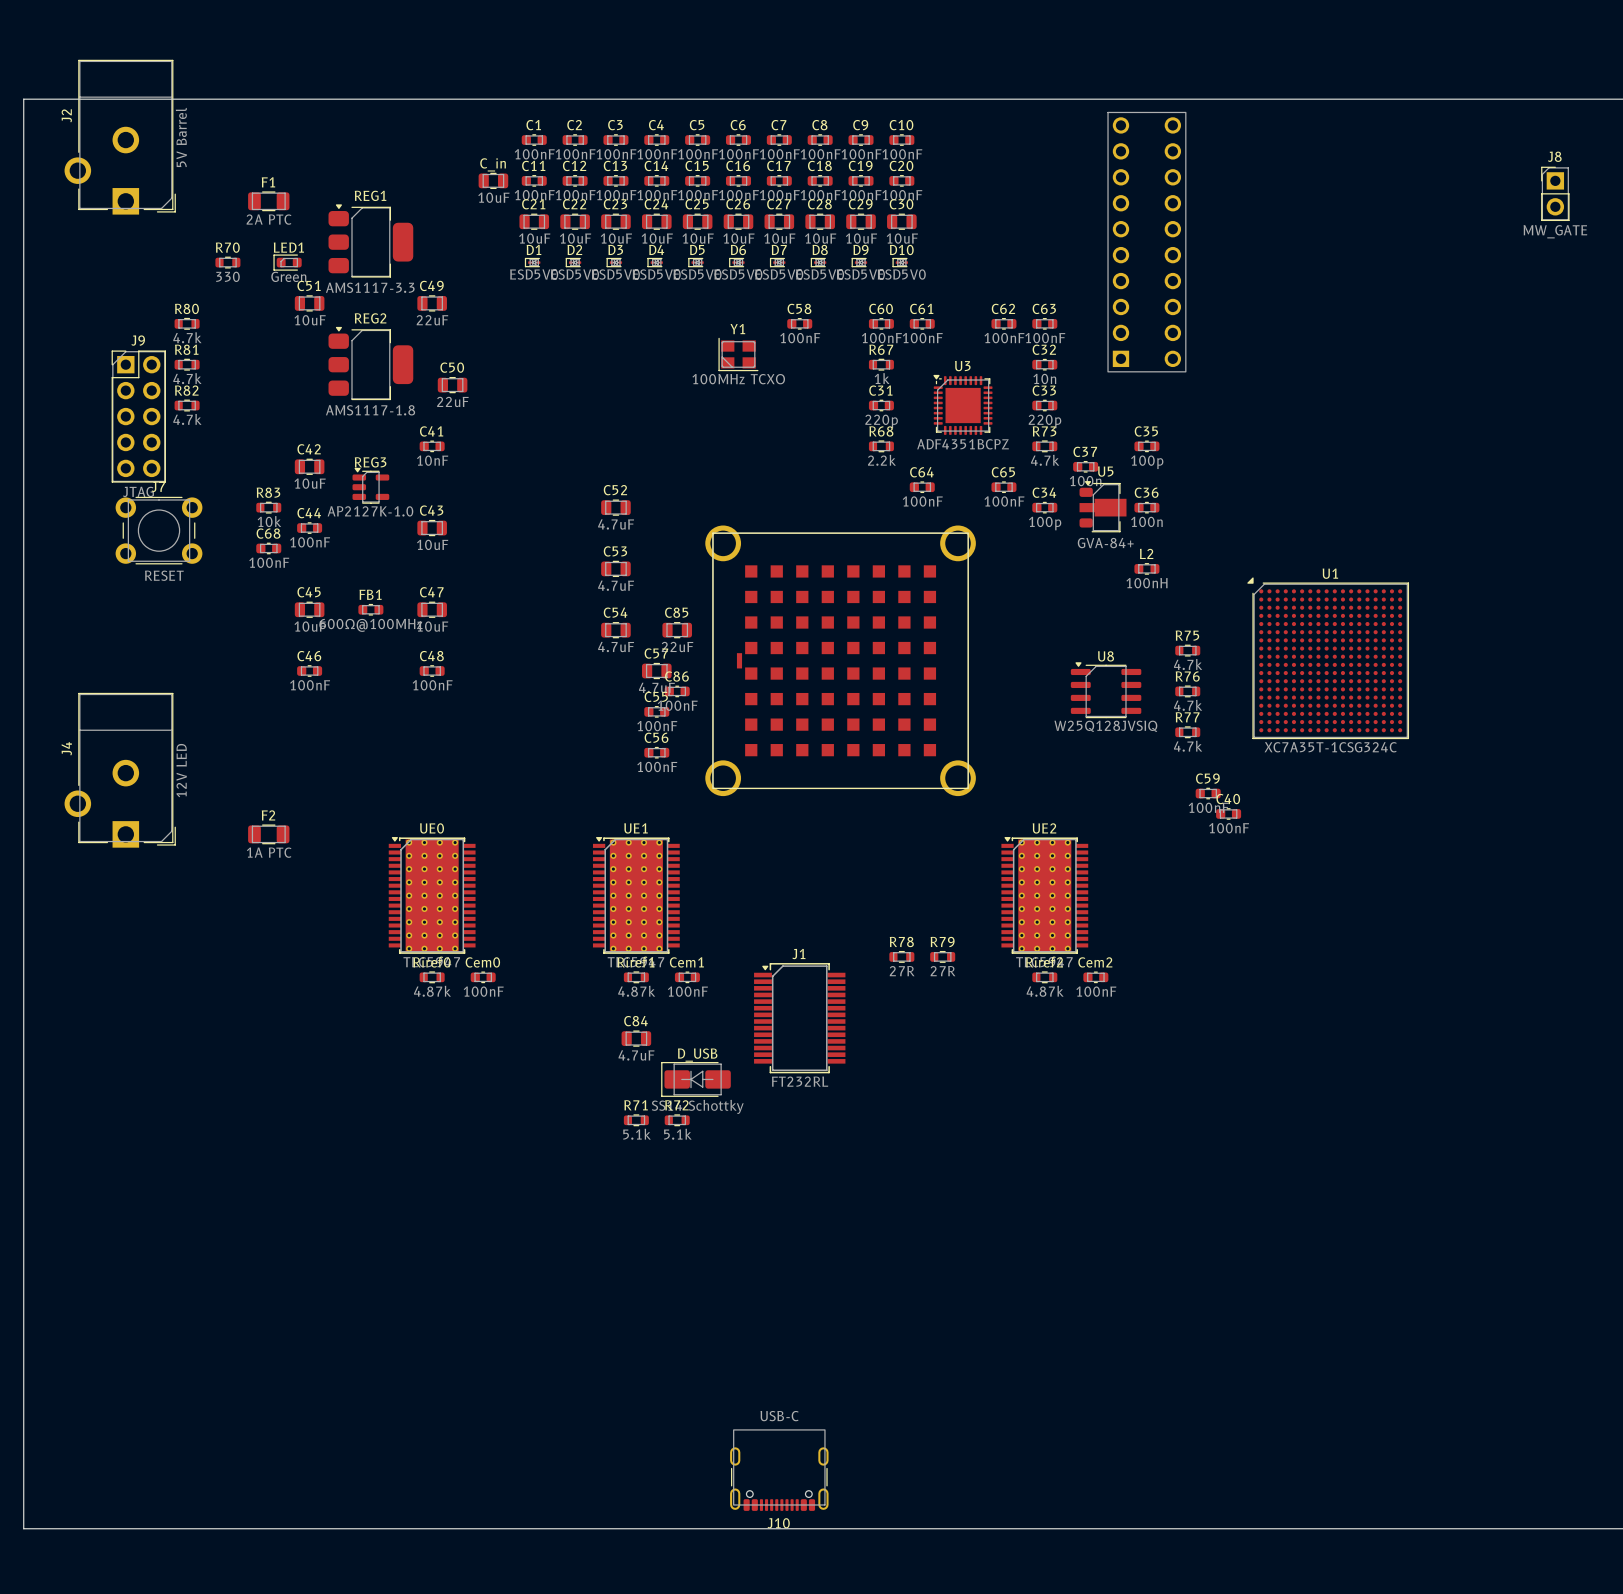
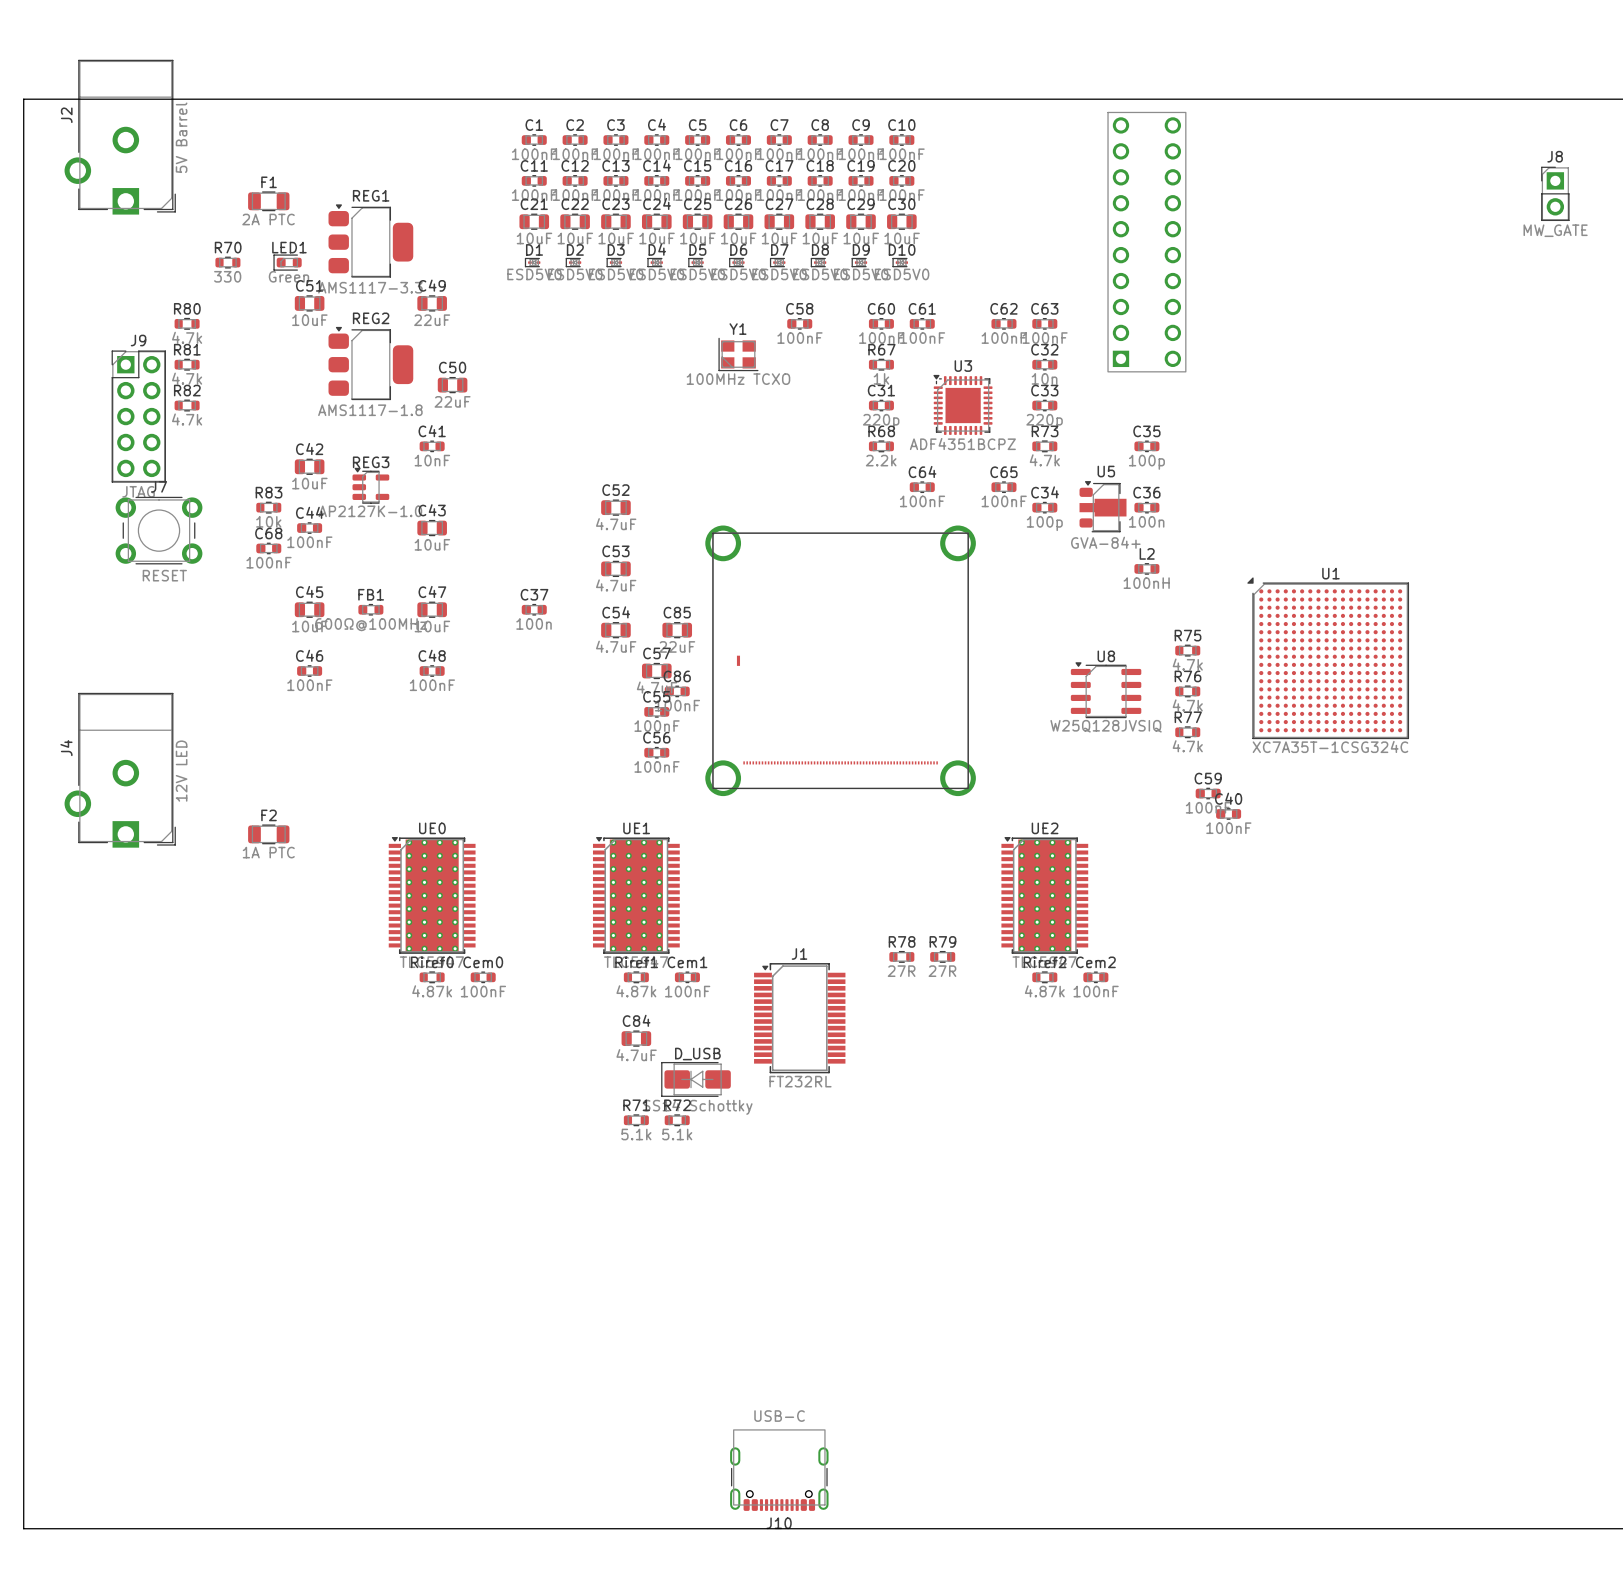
C_in: 10uF (493, 180) -> none
C37 position: (1085, 466) -> (534, 609)
part footprint: [705, 525, 976, 797] -> [705, 525, 976, 797]

